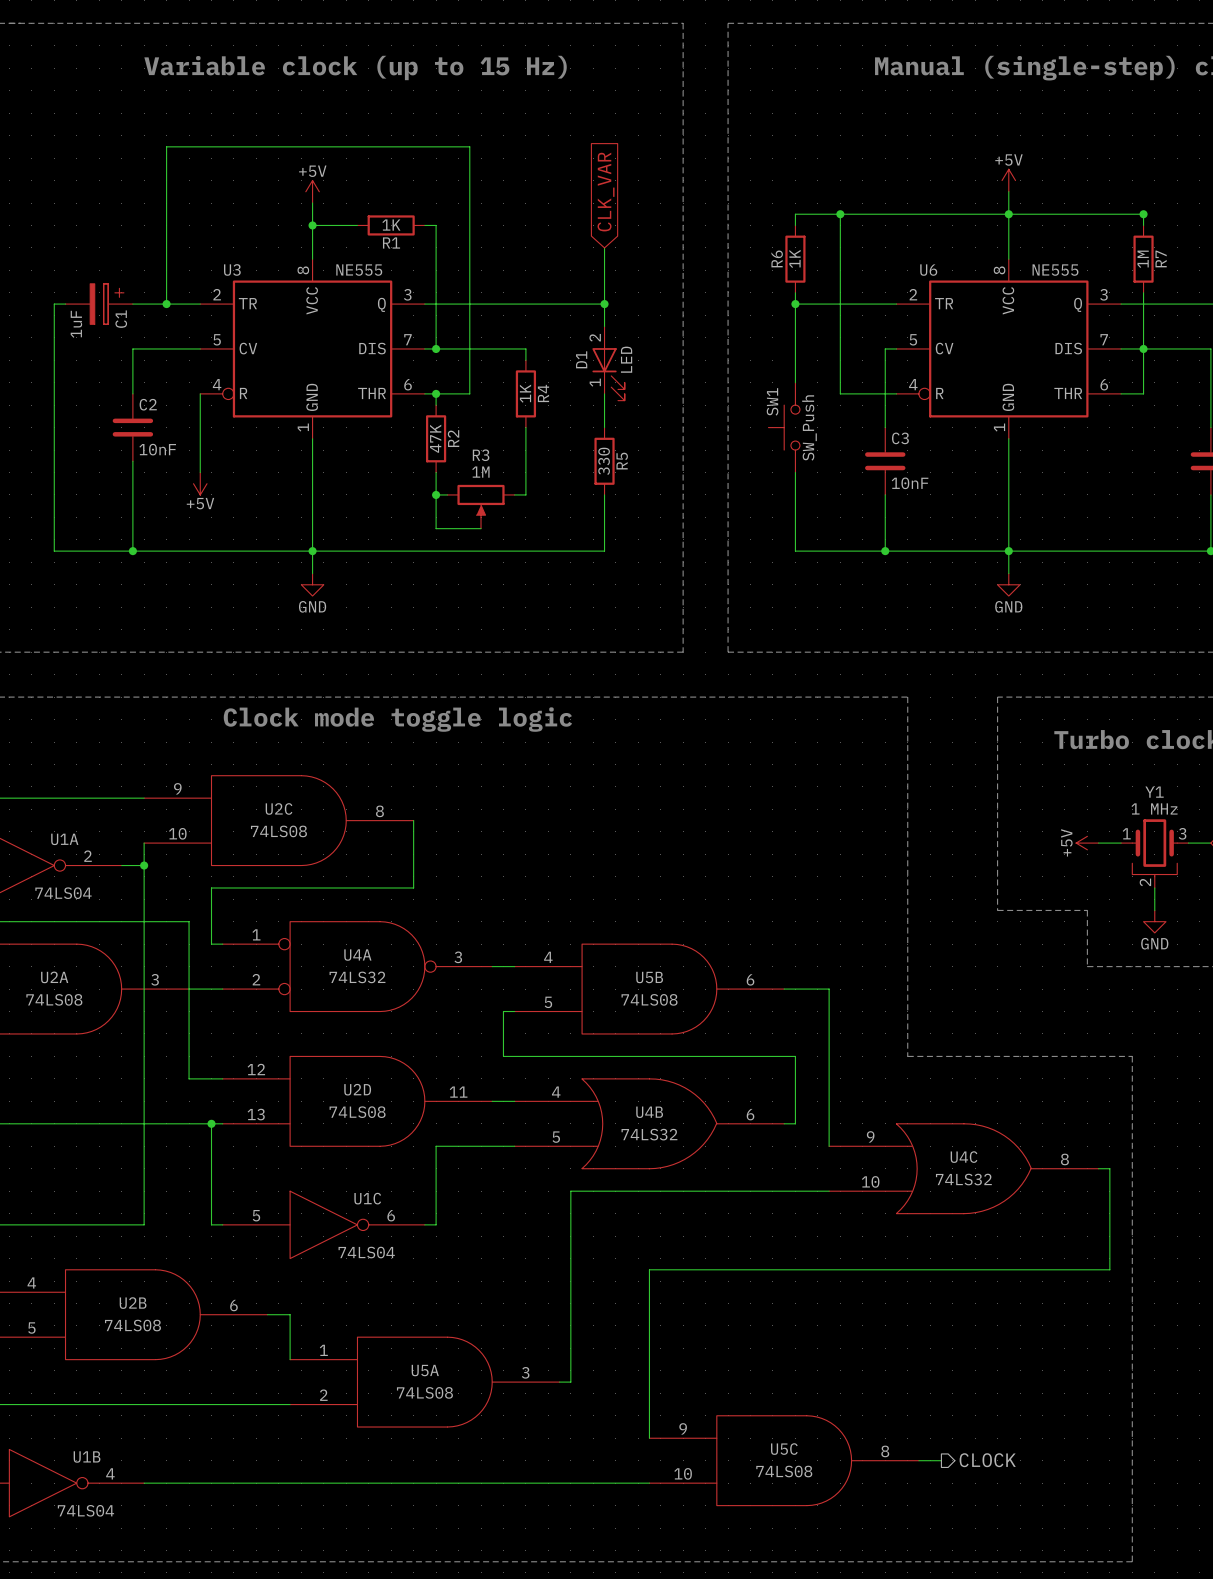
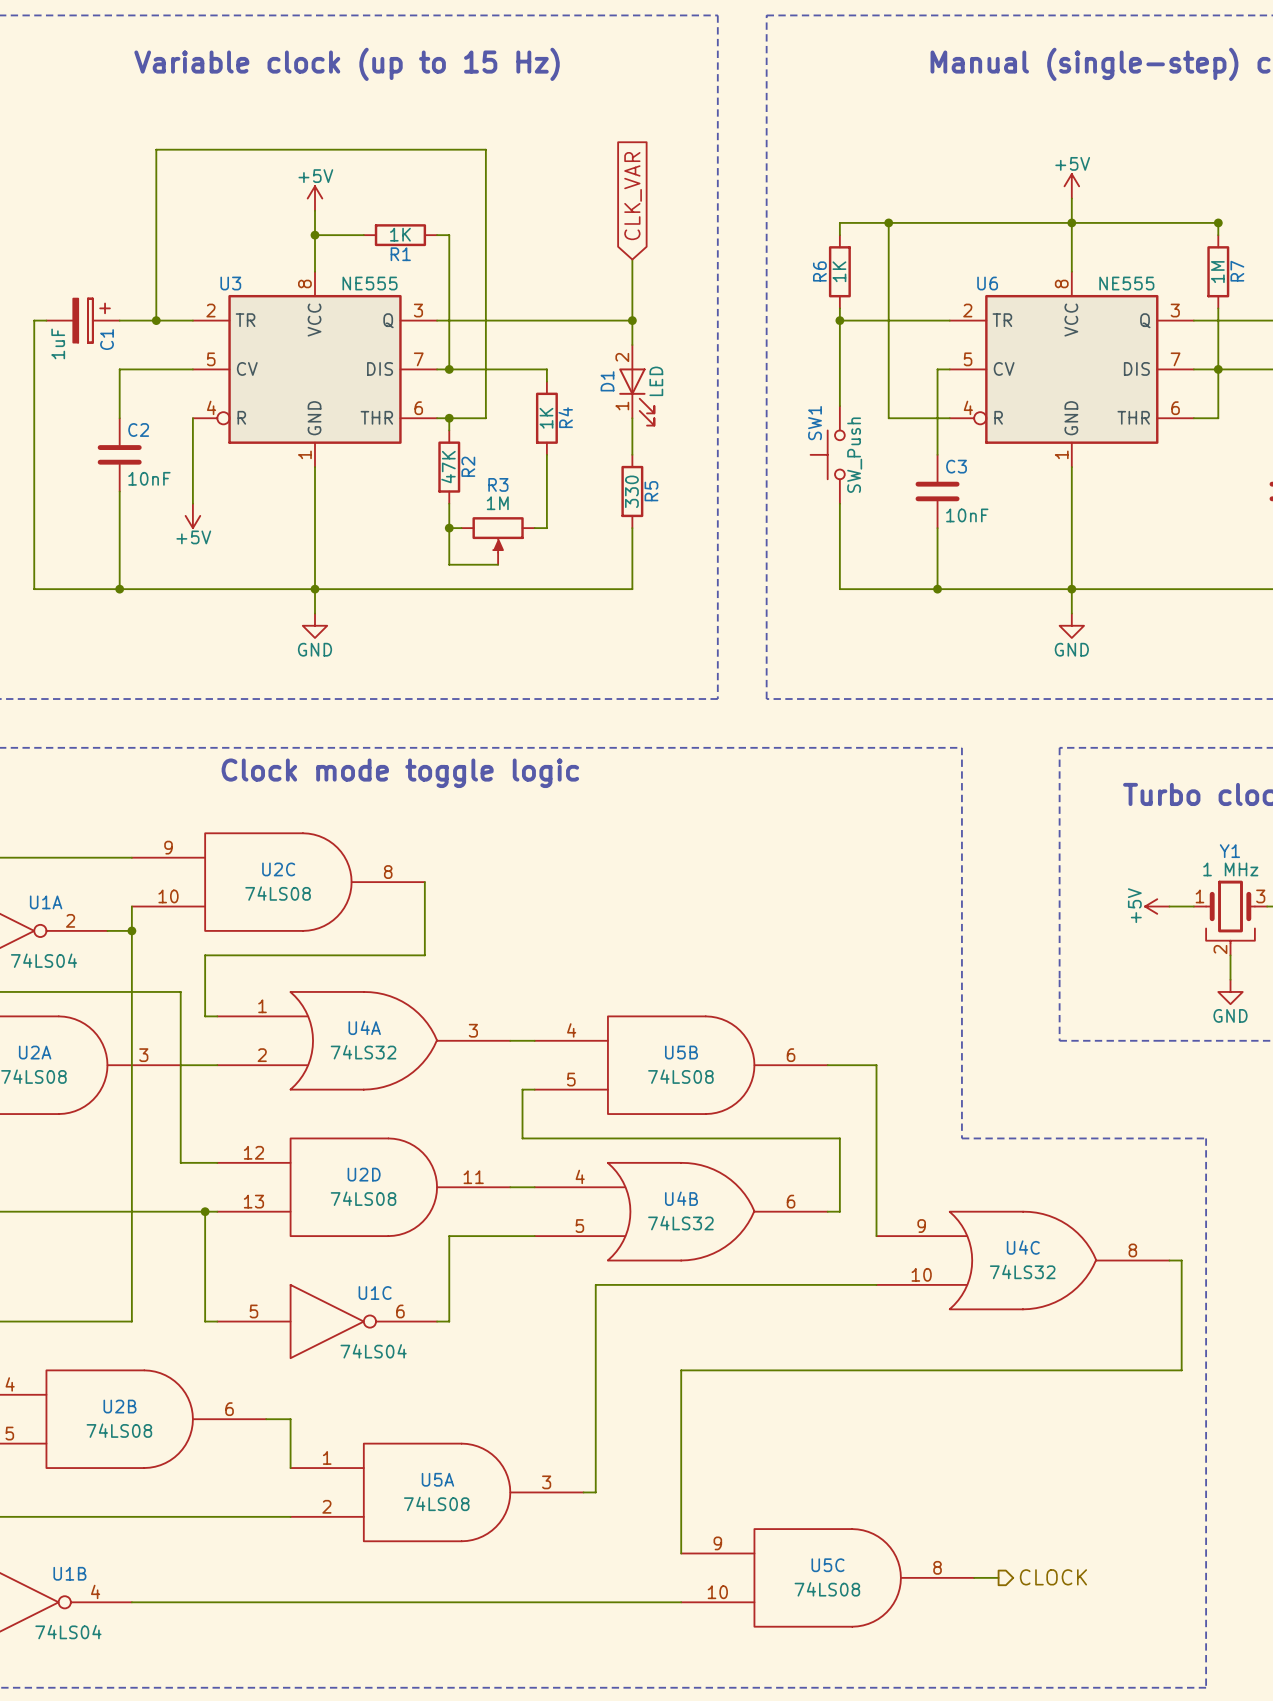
line: (997, 910) (1087, 910) (1087, 966) -> (1059, 979) (1059, 1040) (1157, 1040)
U4A symbol: [222, 921, 493, 1012] -> [217, 991, 511, 1090]

